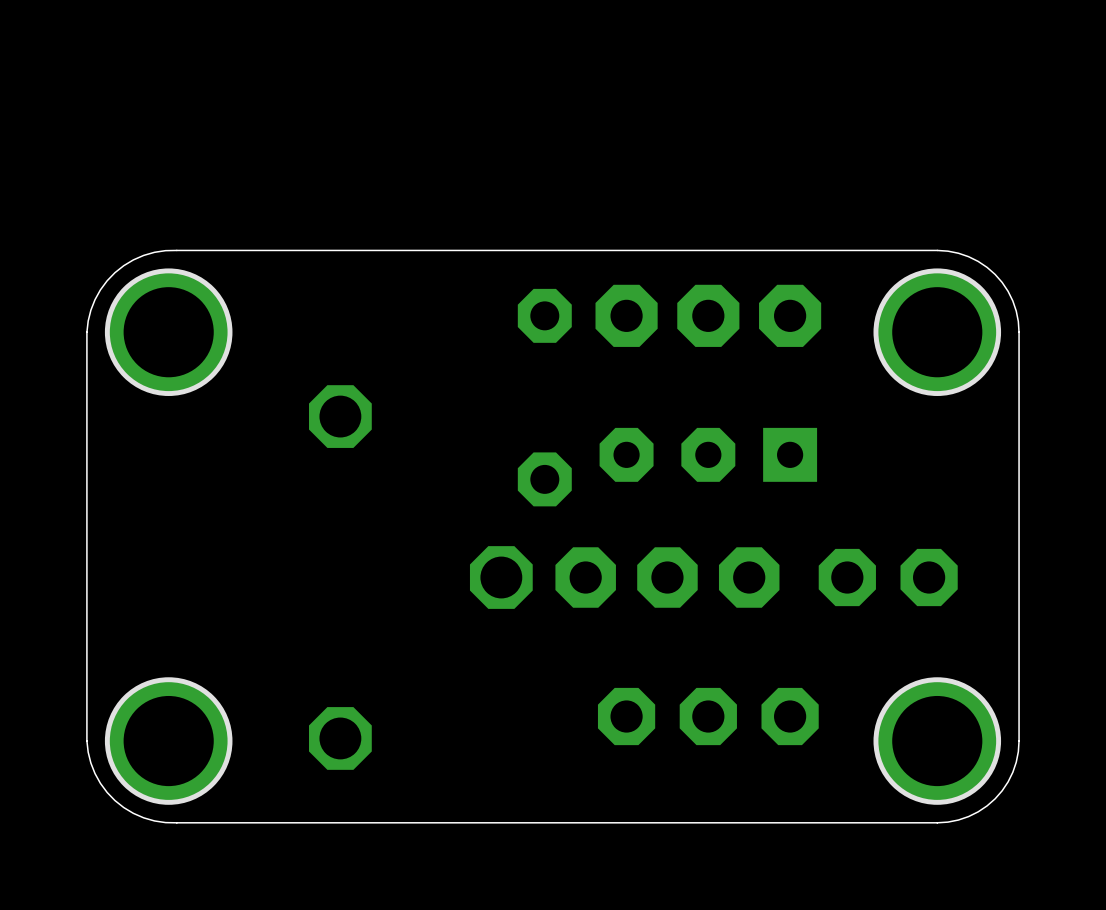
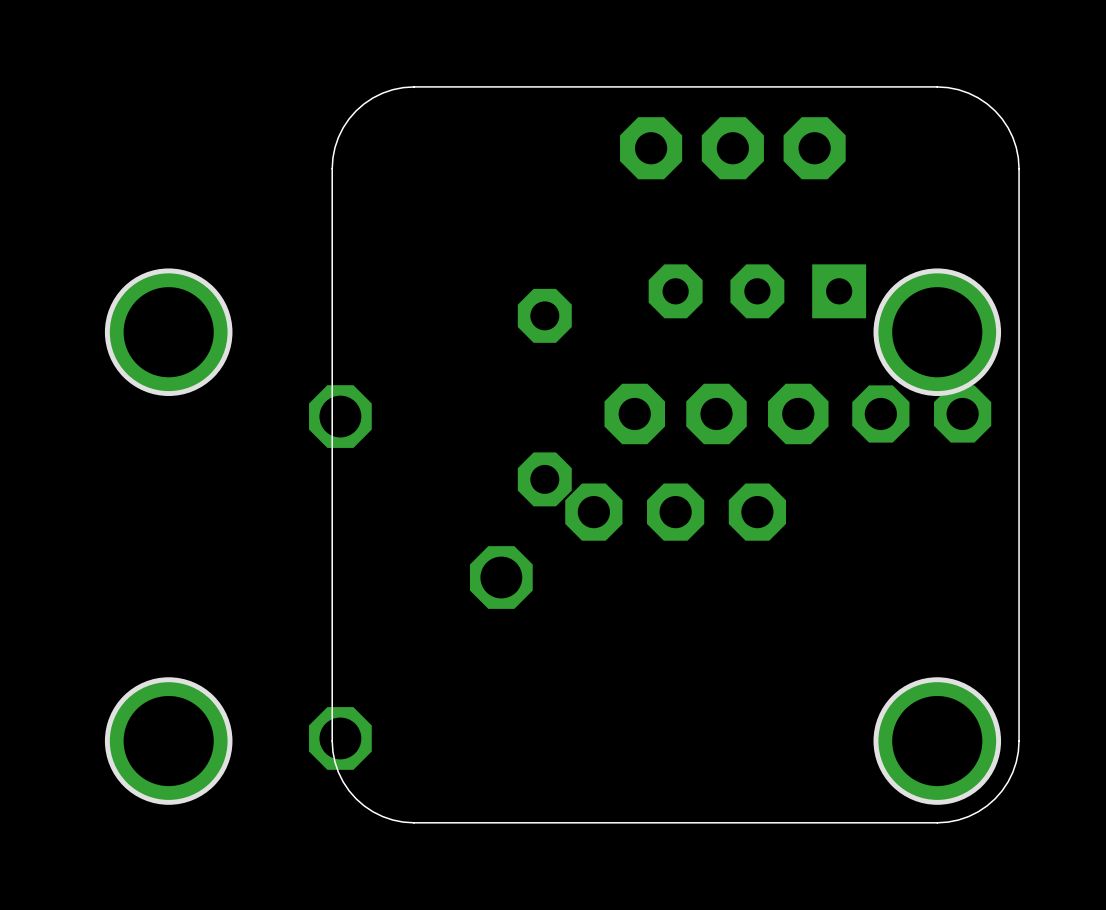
part position: (708, 315) -> (732, 148)
board edge: (1019, 332) (1012, 300) (995, 274) (968, 256) (947, 251) (165, 250) (143, 255) (114, 272) (95, 299) (86, 332) (86, 741) (95, 773) (114, 800) (133, 813) (154, 820) (176, 822) (413, 822) -> (1019, 332) (1019, 168) (1016, 147) (1008, 127) (995, 110) (968, 93) (937, 86) (413, 86) (392, 89) (364, 103) (349, 118) (338, 137) (332, 168) (332, 751) (338, 772) (356, 798) (382, 816) (413, 822)
part position: (708, 454) -> (757, 291)
part position: (667, 577) -> (716, 413)
part position: (888, 577) -> (921, 413)
part position: (708, 716) -> (675, 512)

